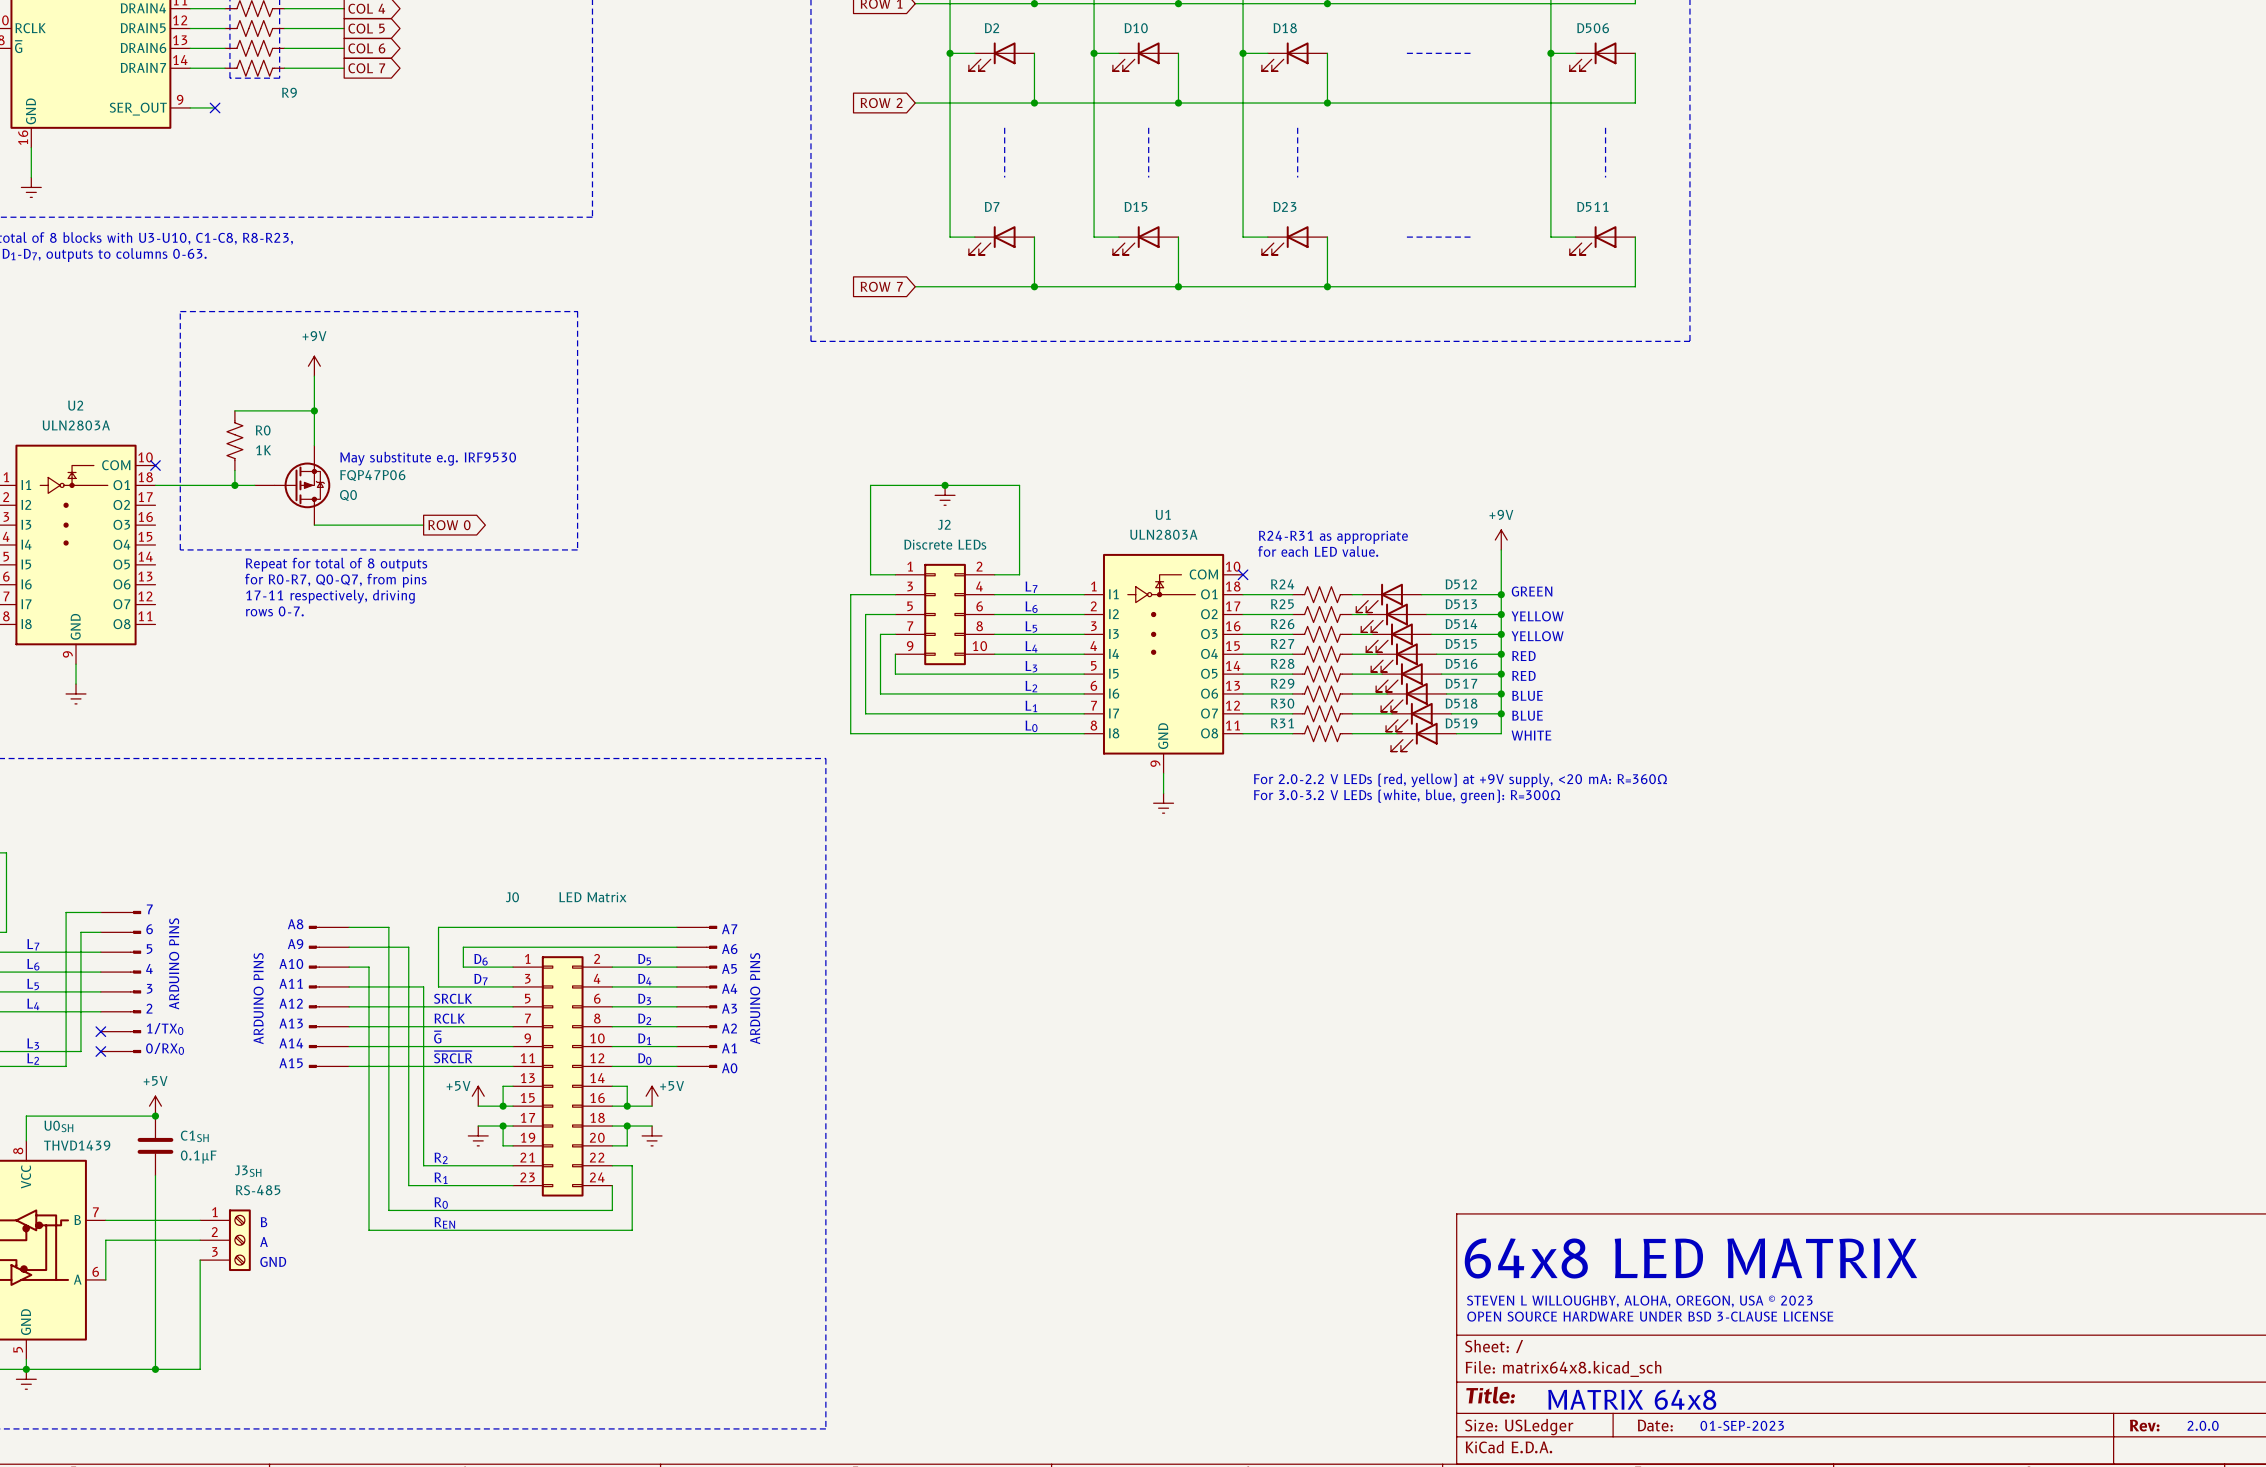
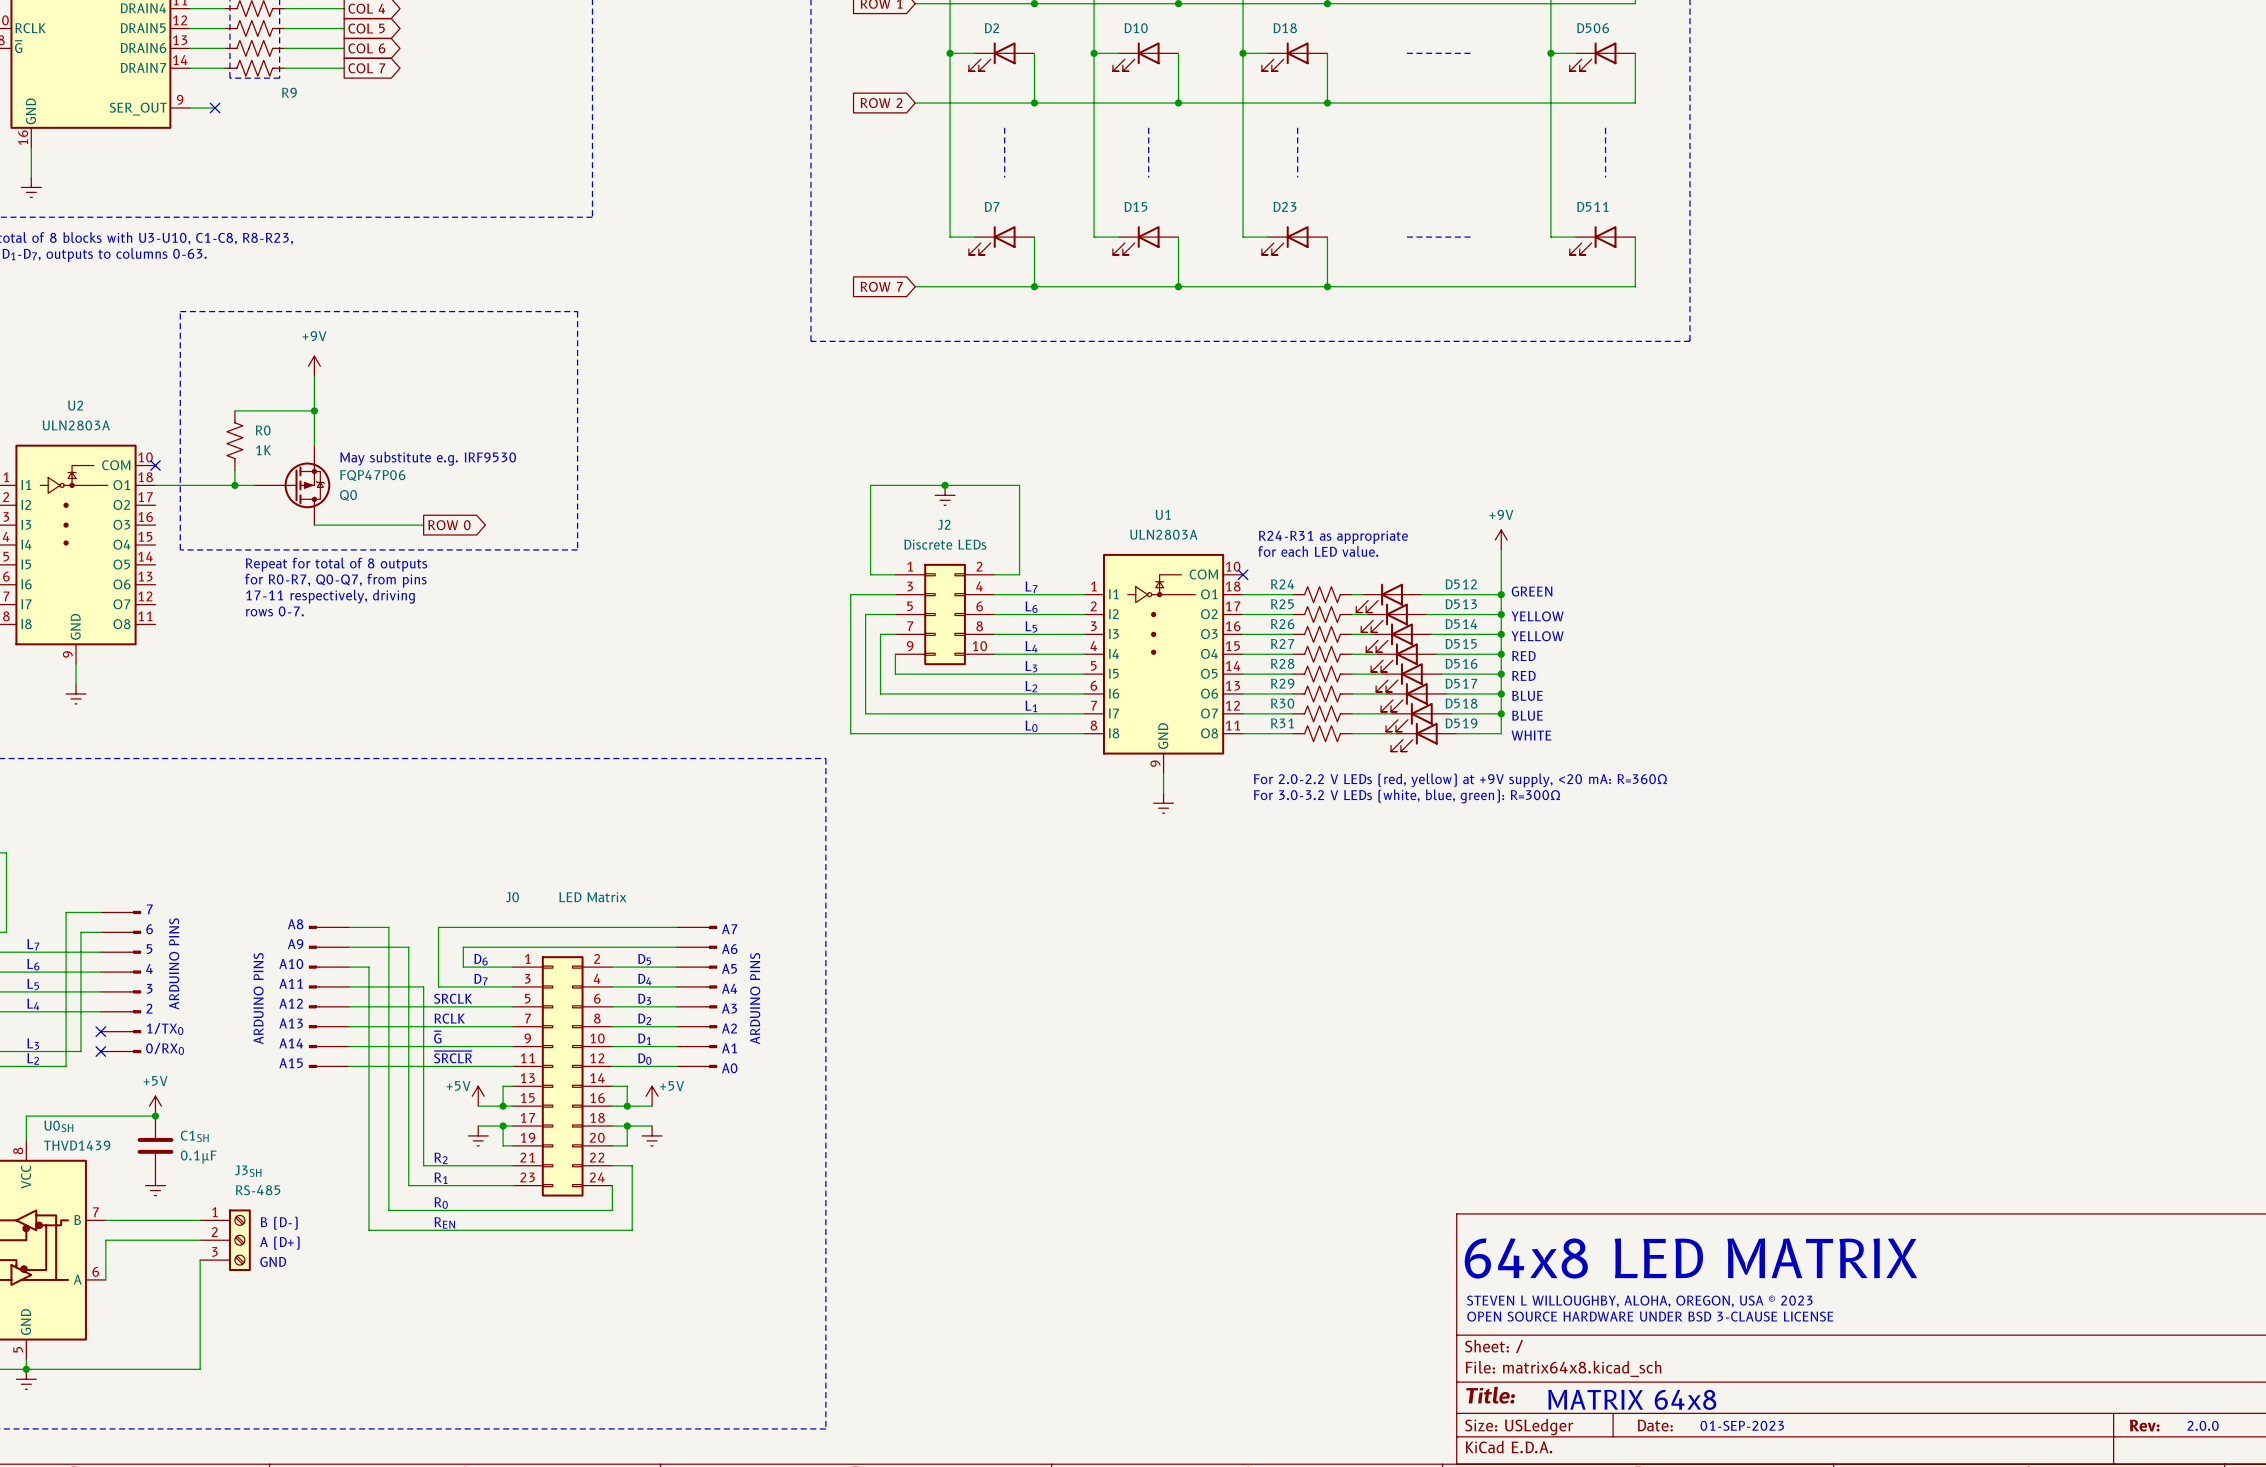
wire: (155, 1175) (155, 1369) -> none
power symbol: none -> (155, 1185)
text: B (264, 1222) -> B (D-) (279, 1223)
text: A (263, 1242) -> A (D+) (279, 1243)
junction: (155, 1369) -> none

